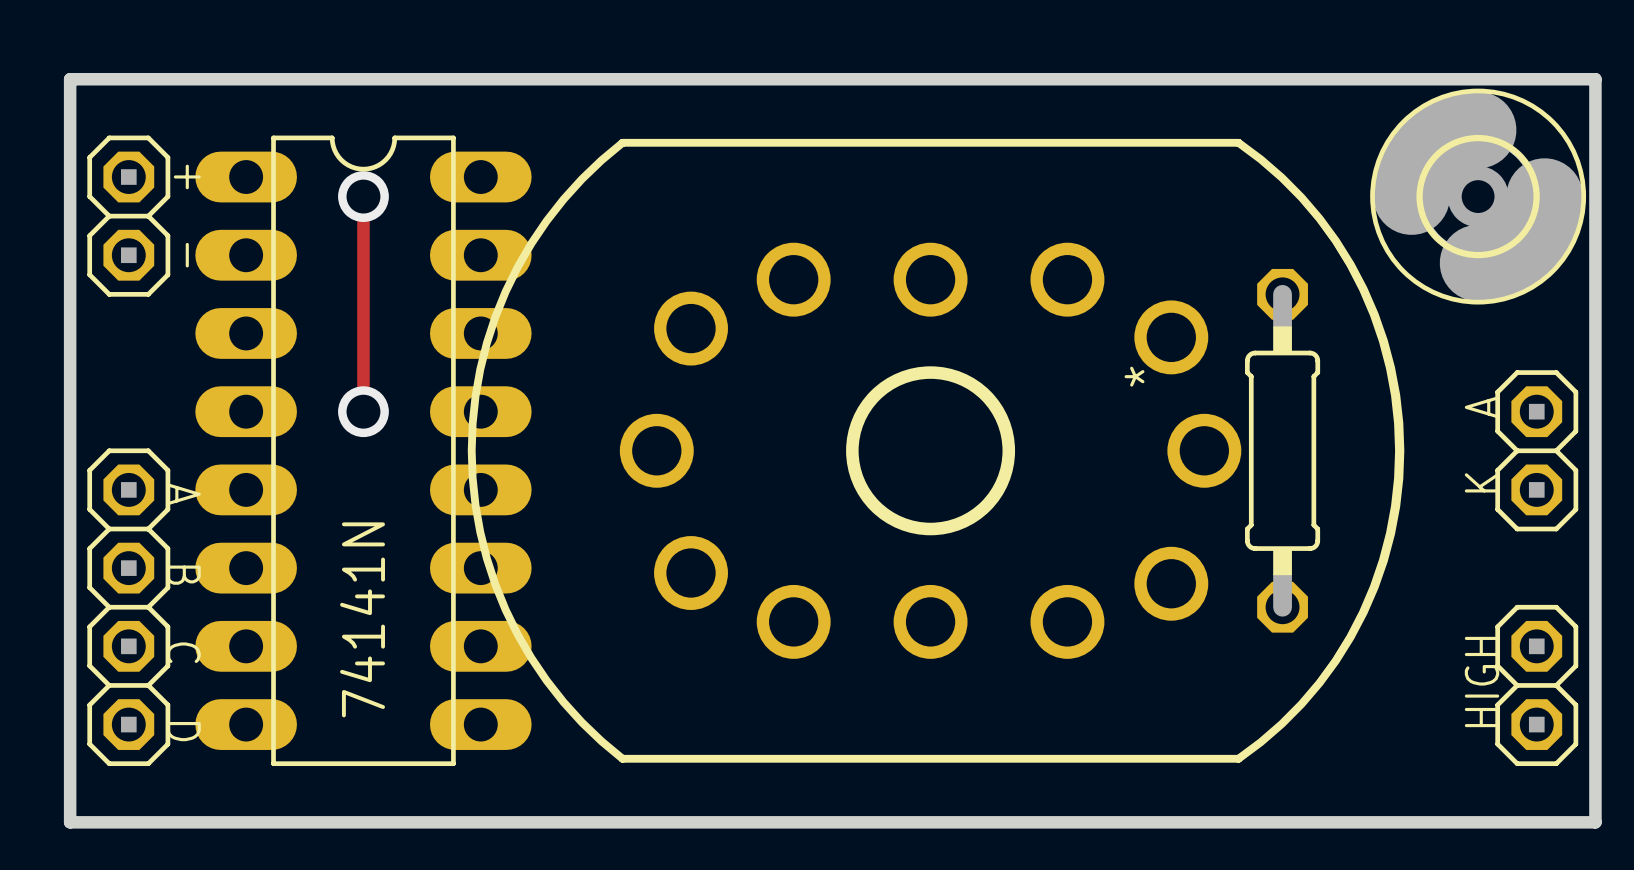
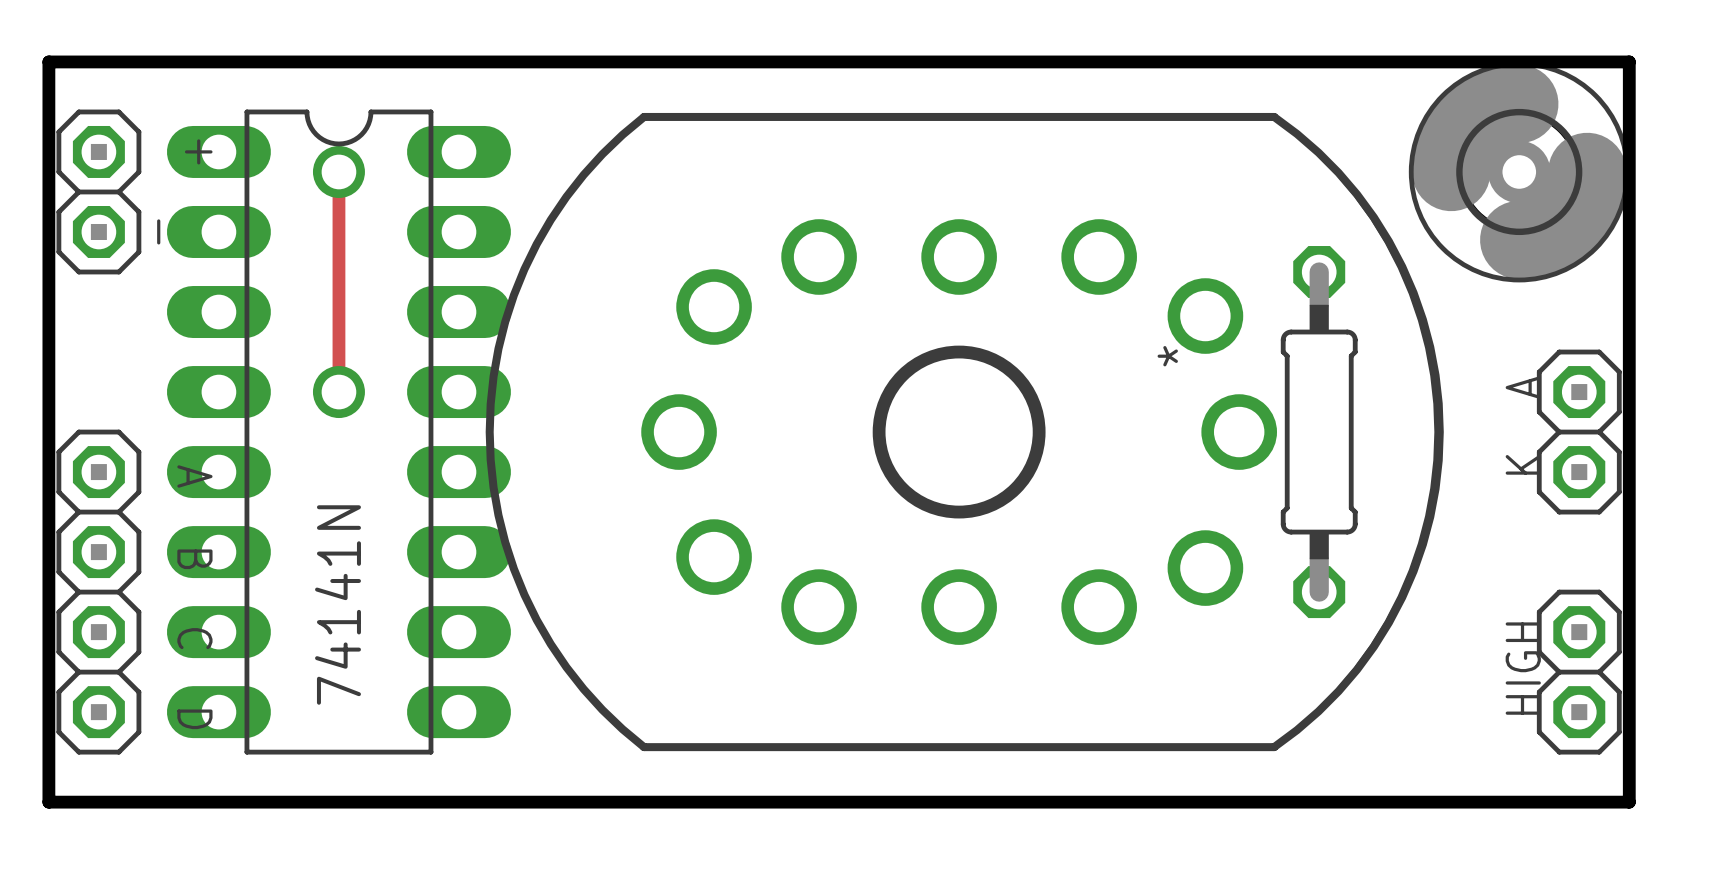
board edge: (70, 79) (70, 822) (1595, 822) (1595, 79) (70, 79) -> (48, 61) (48, 802) (1629, 802) (1629, 61) (48, 61)
track: (363, 196) (363, 411) -> (338, 171) (338, 392)
via position: (363, 196) -> (338, 171)
part position: (128, 216) -> (98, 191)
text position: - (187, 255) -> - (158, 231)
via position: (363, 411) -> (338, 392)
part position: (363, 450) -> (338, 432)
part position: (128, 607) -> (98, 592)

